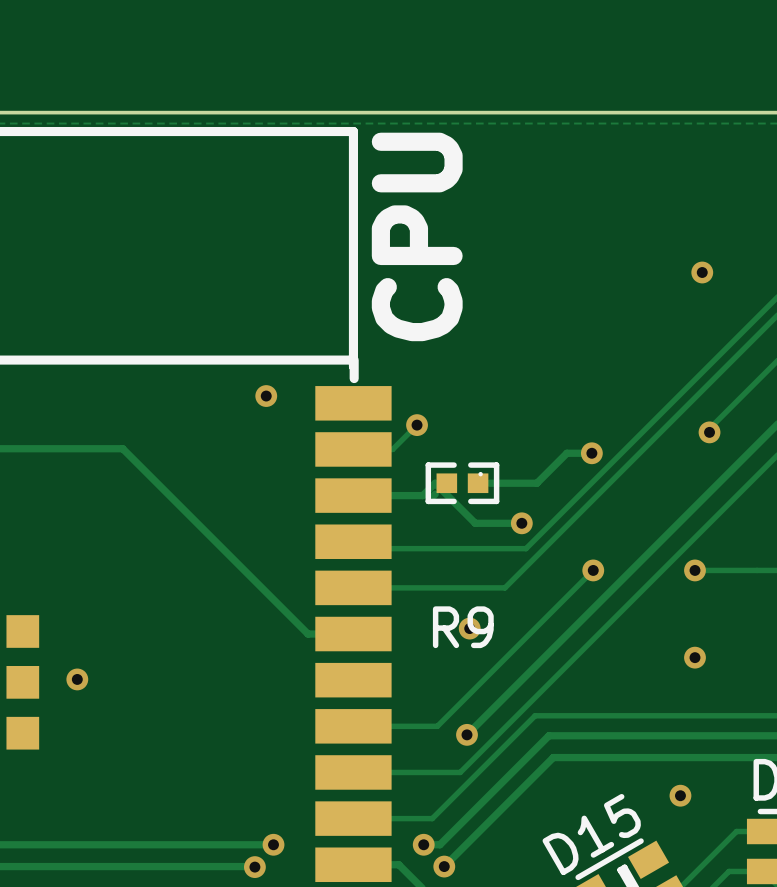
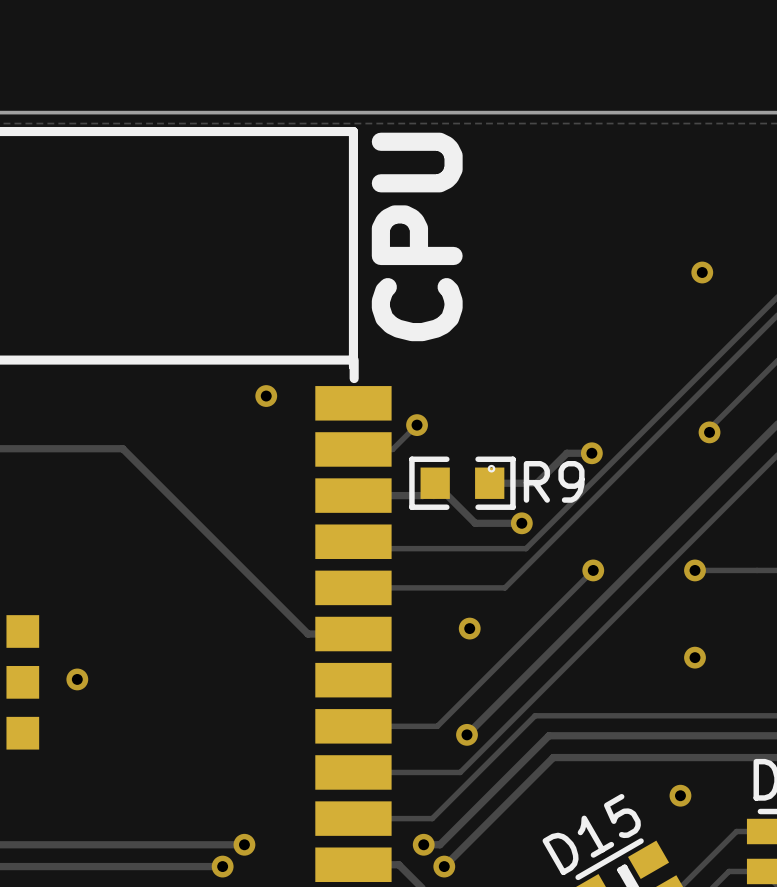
R9 footprint: [425, 462, 500, 505] -> [409, 456, 516, 510]
R9 name position: R9 (463, 627) -> R9 (554, 481)
track: (244, 844) (273, 844) -> none
via: none -> (244, 844)
via: (273, 844) -> none
track: (222, 866) (254, 867) -> none
via: none -> (222, 866)
via: (254, 867) -> none

